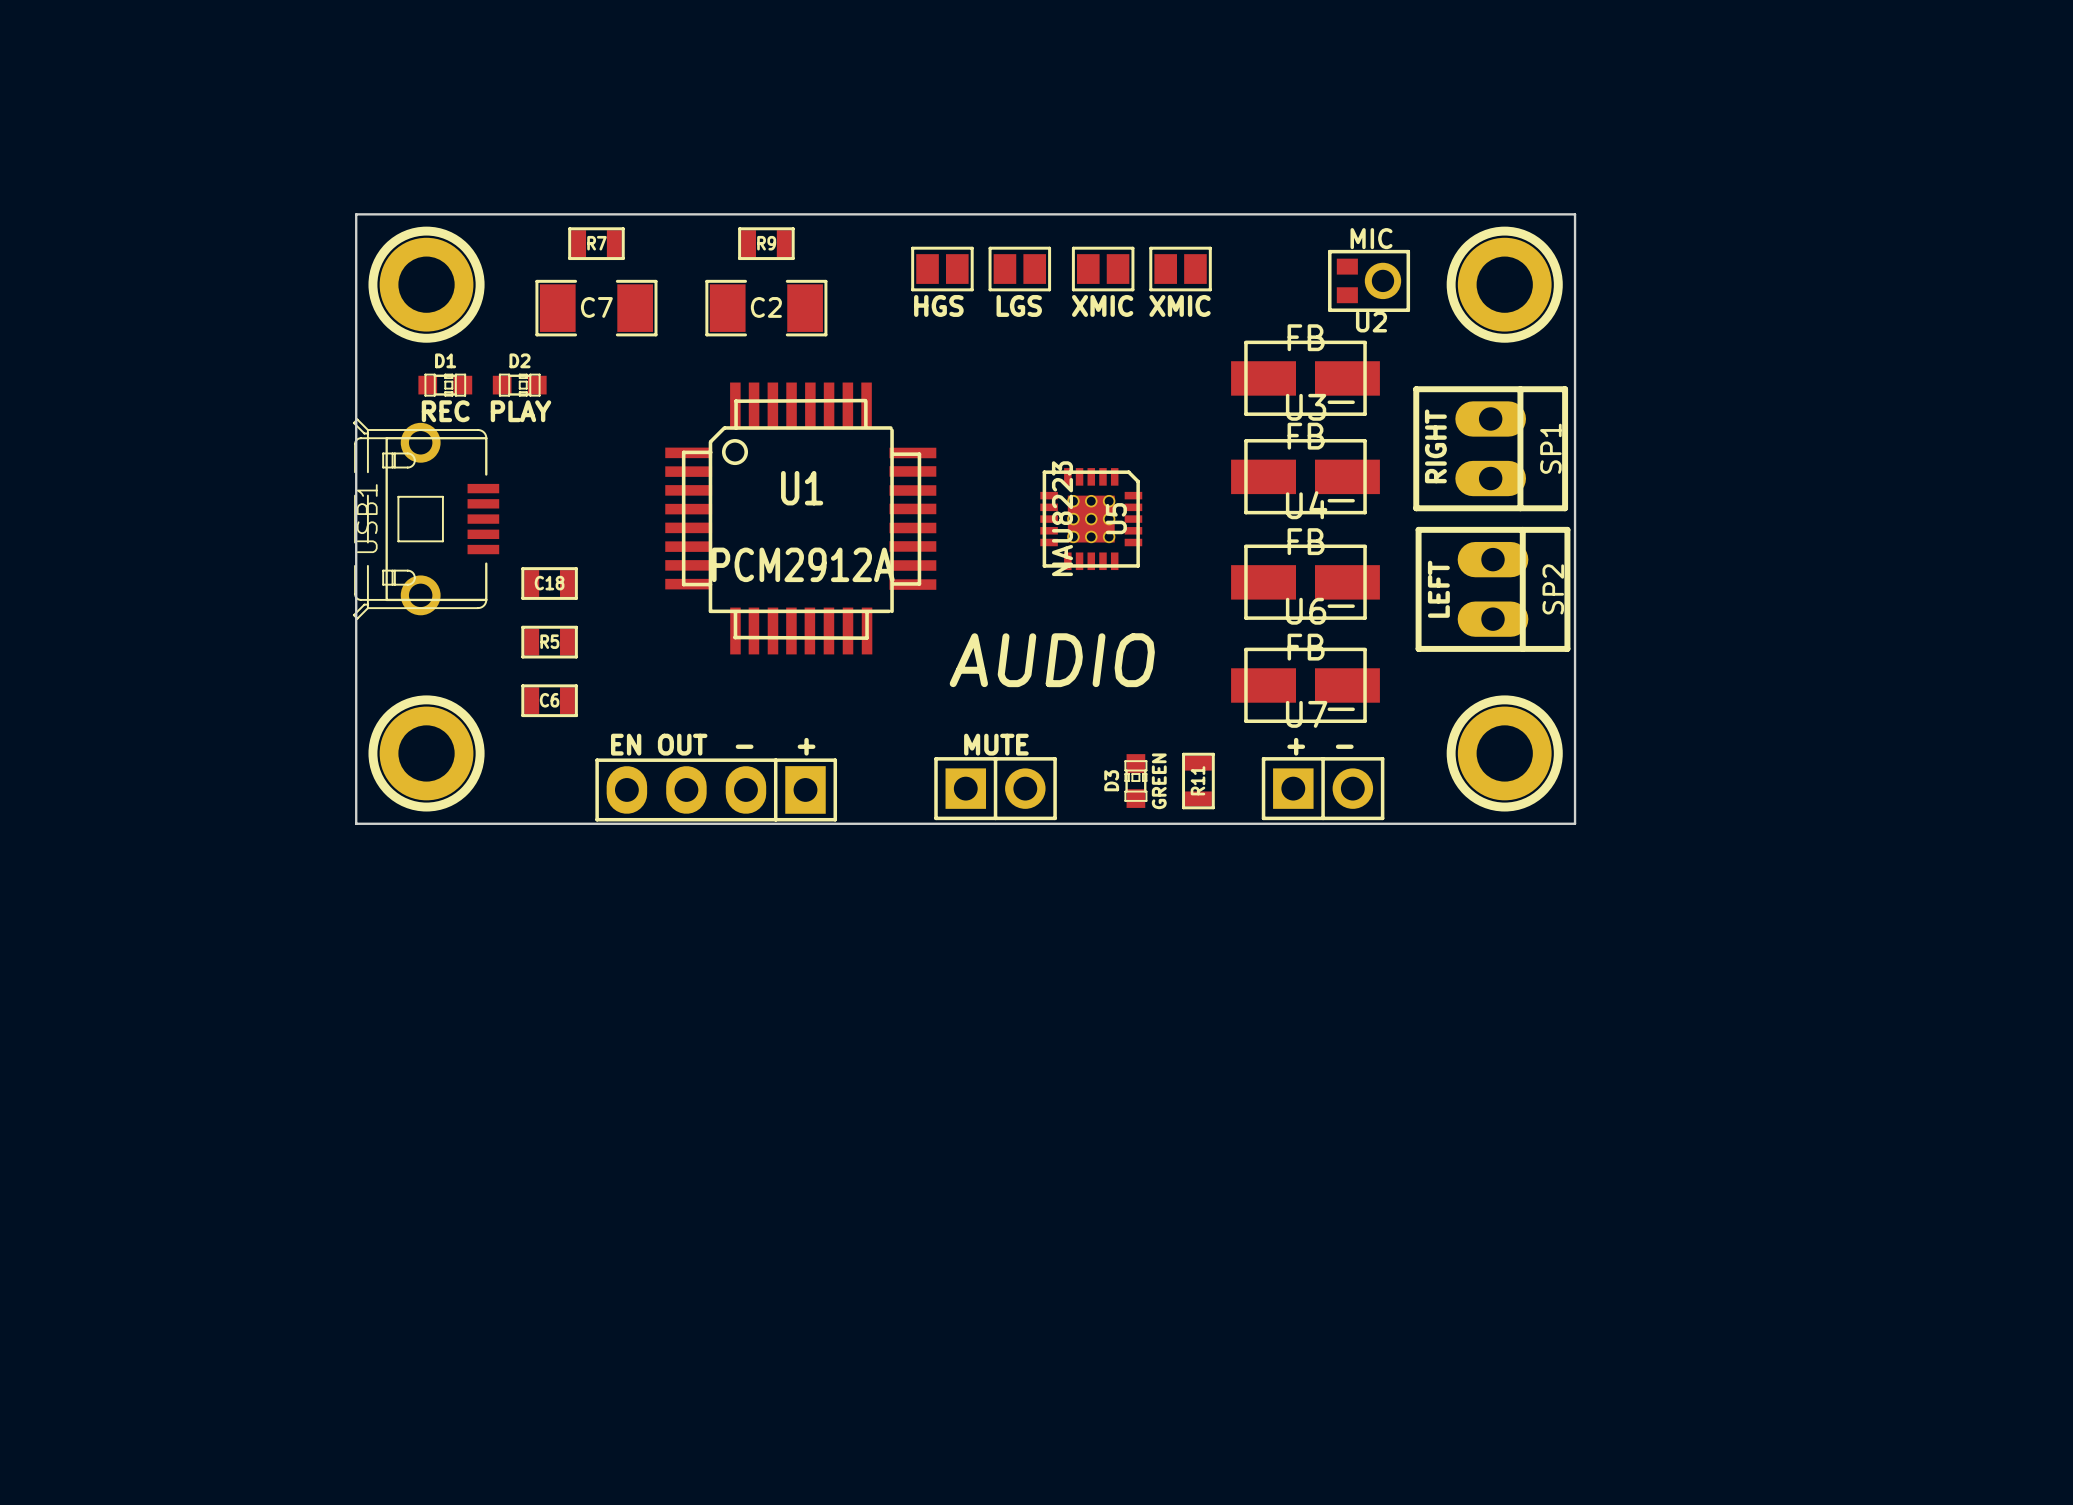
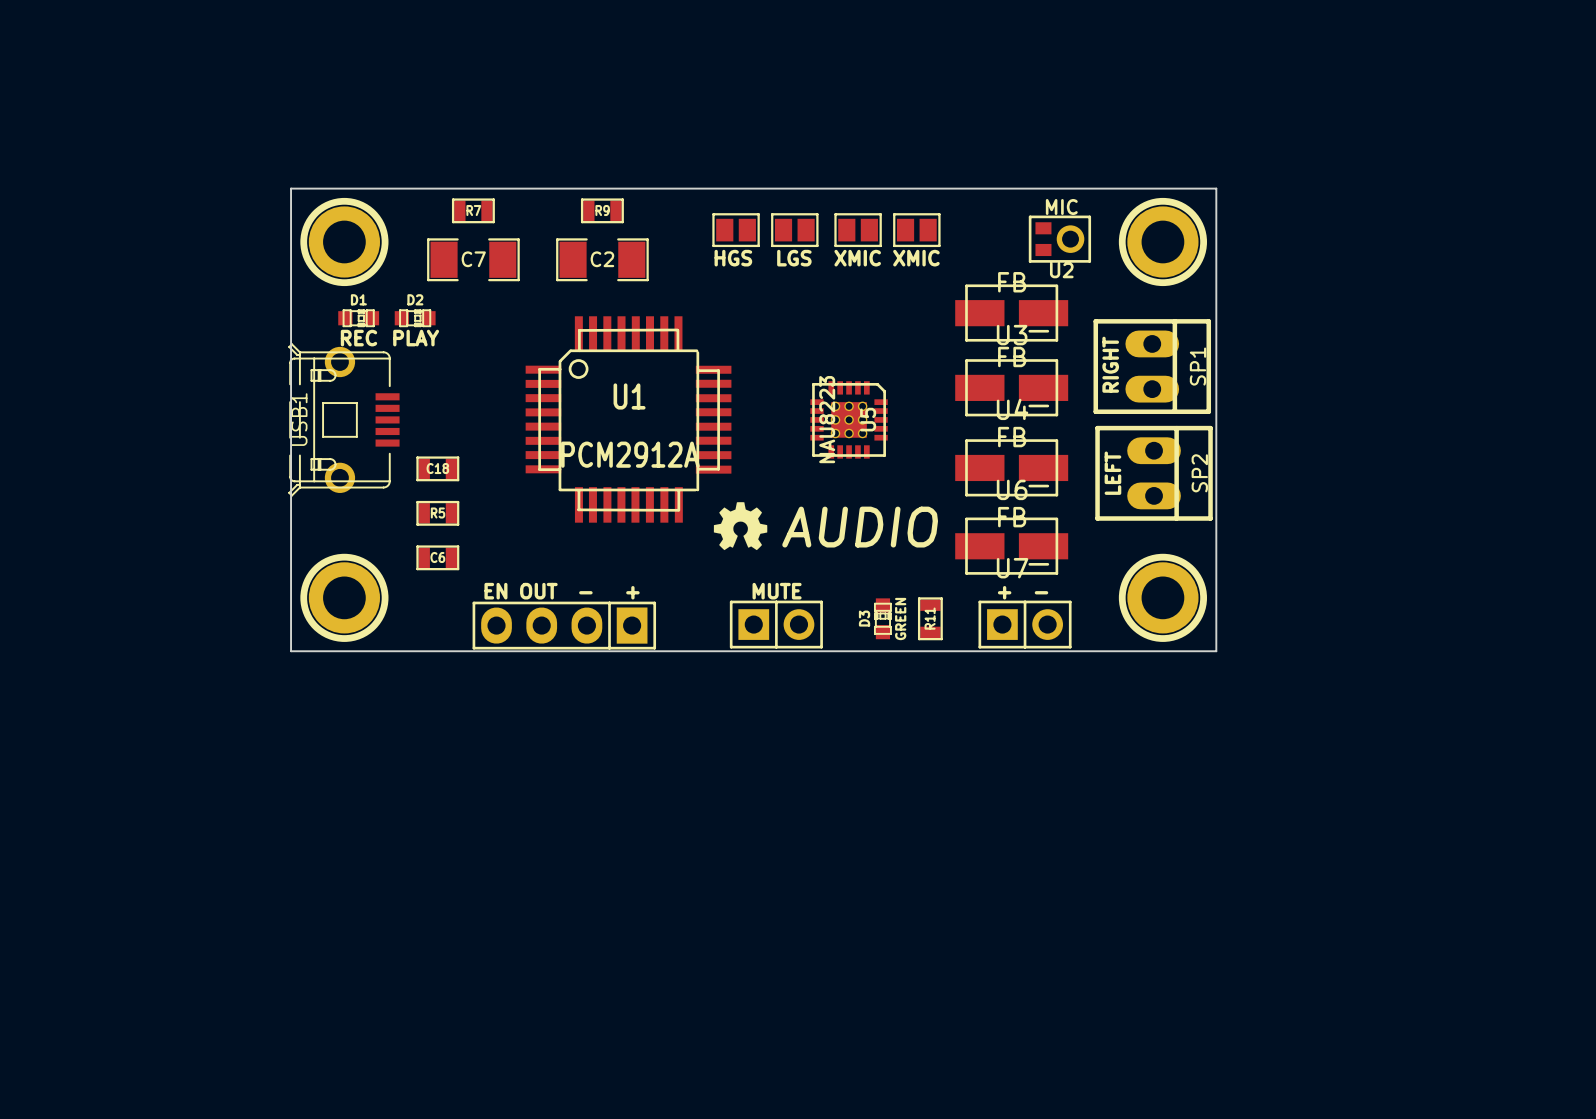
drawing: none -> [713, 502, 768, 551]
text position: AUDIO (1052, 660) -> AUDIO (860, 527)

